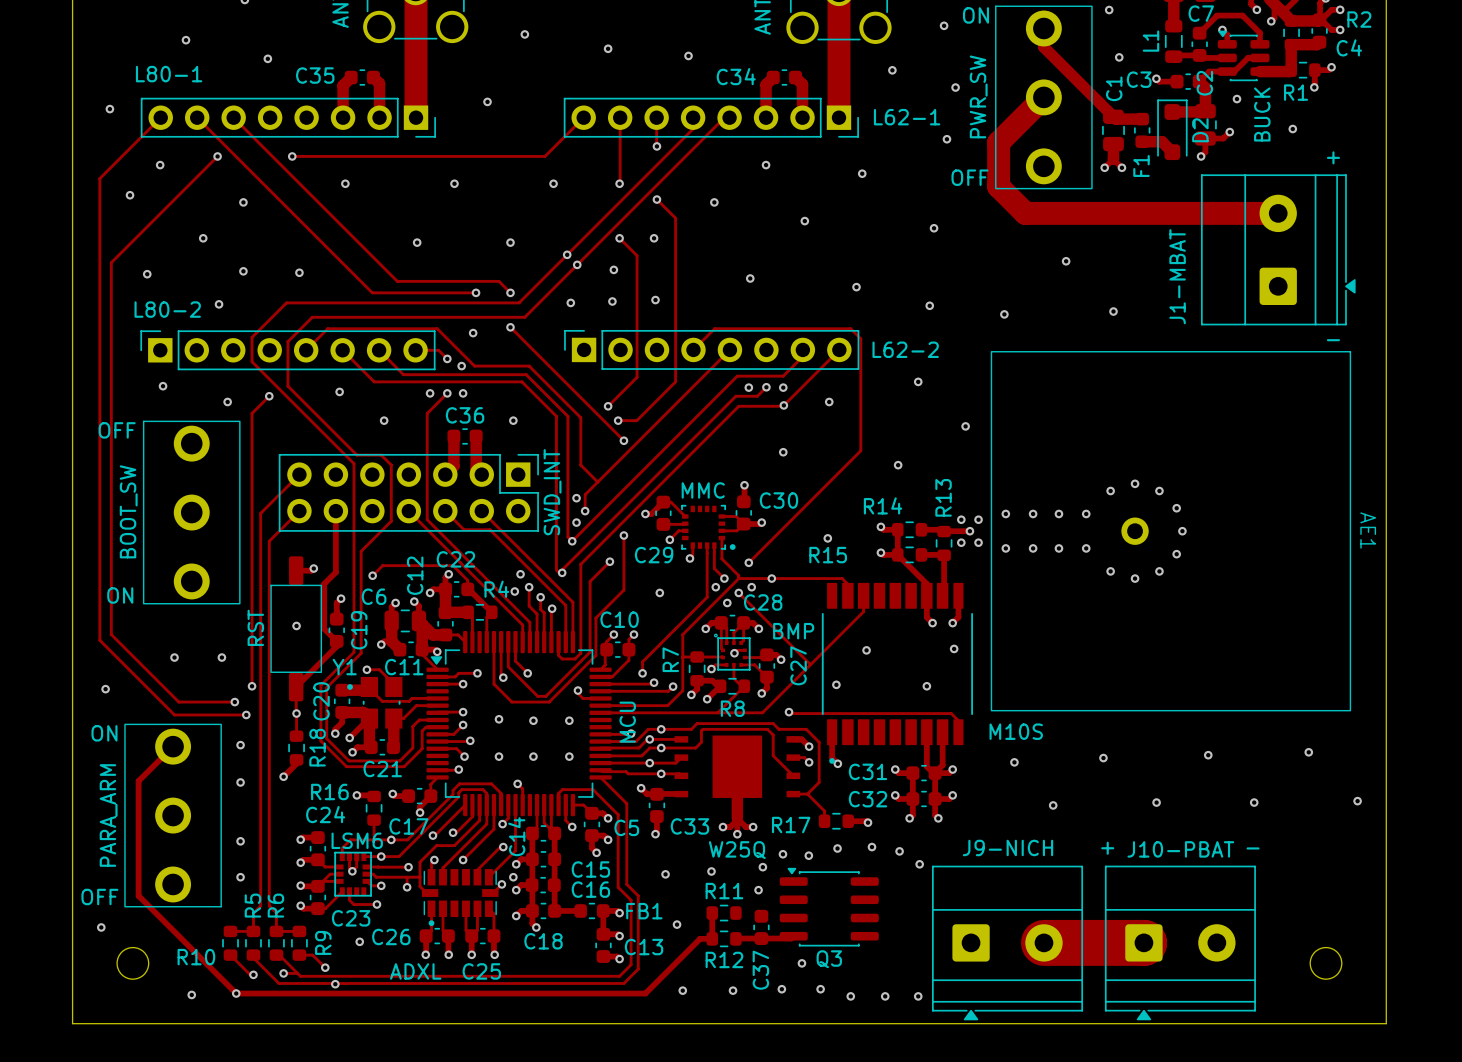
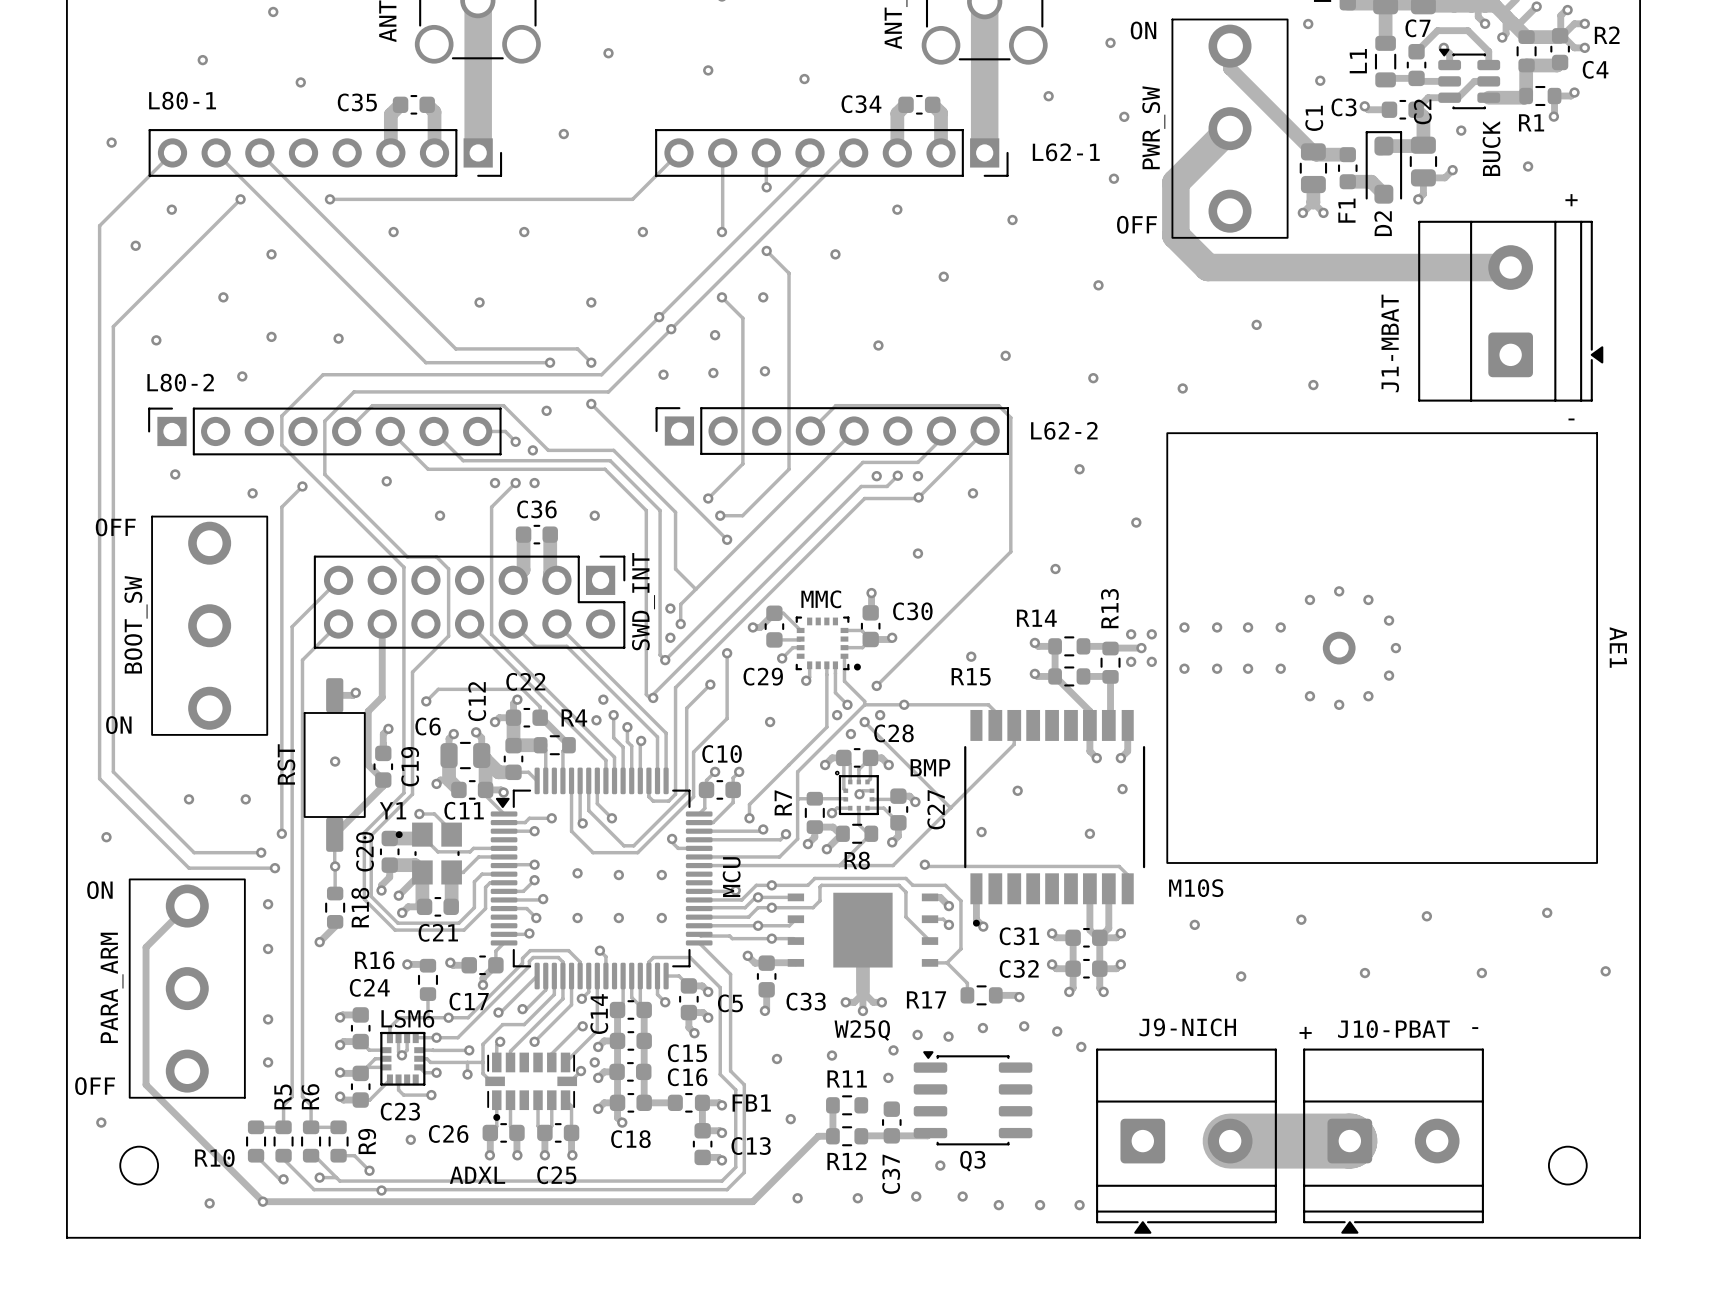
D2 name position: D2 (1200, 130) -> D2 (1383, 223)

